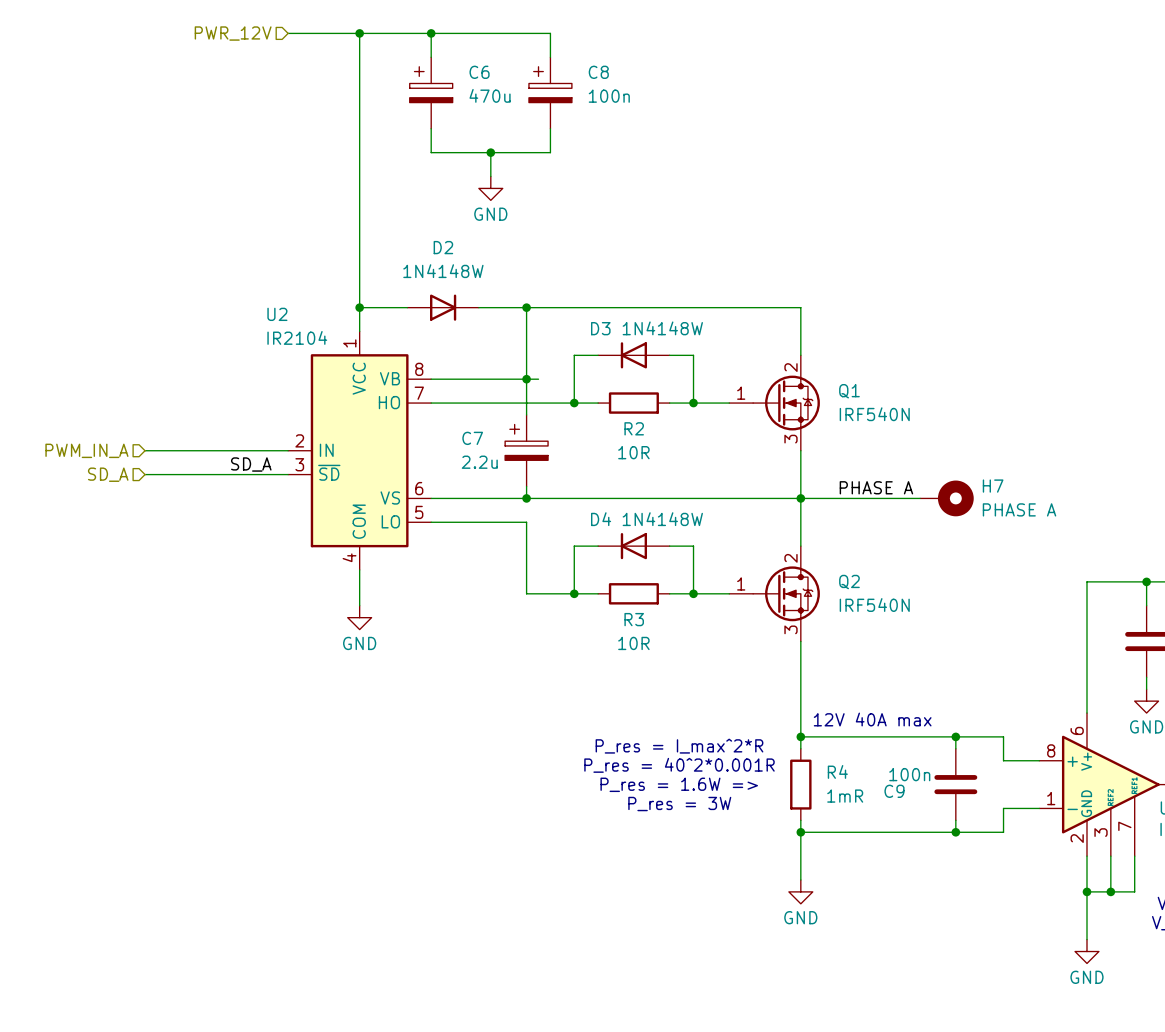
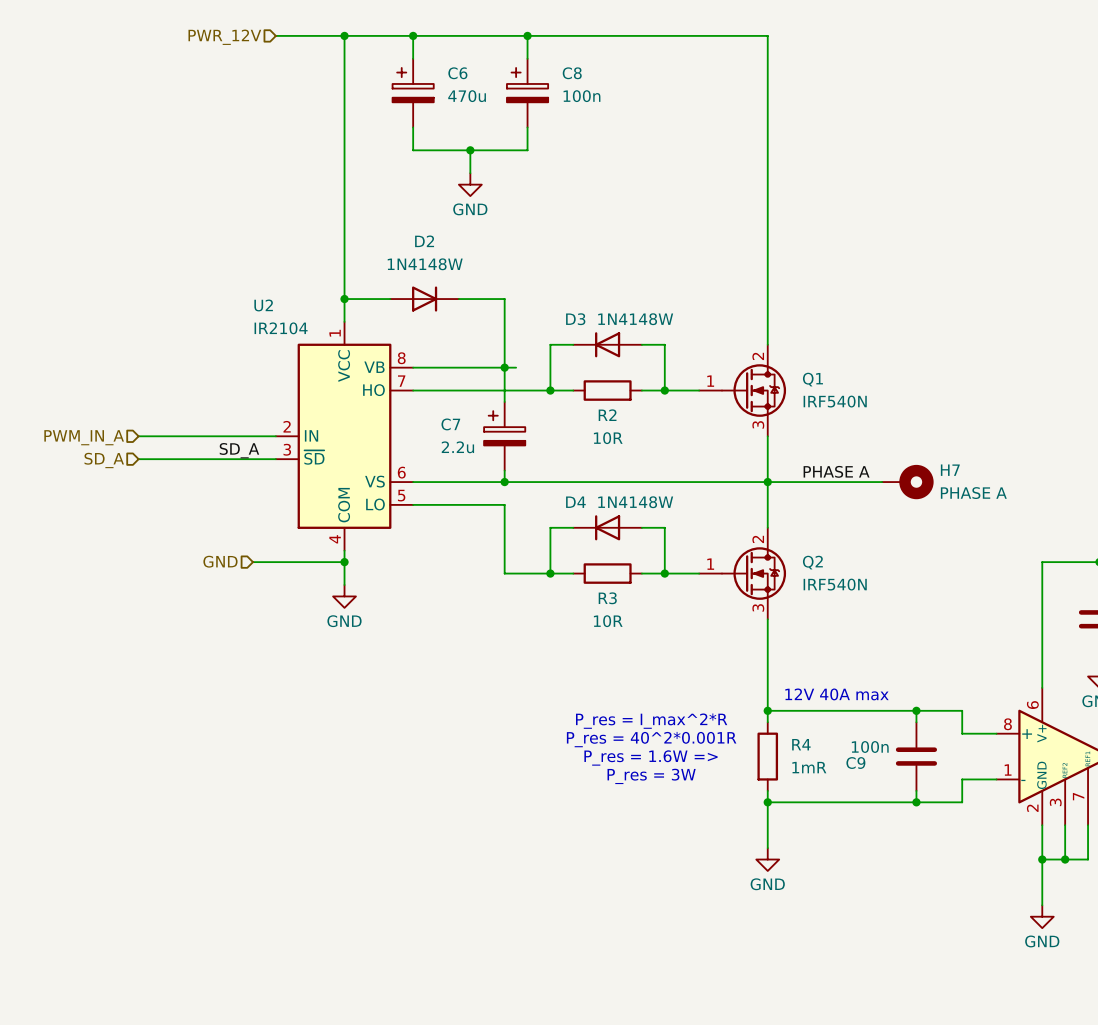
junction: none -> (527, 35)
wire: (526, 307) (800, 307) -> (527, 35) (767, 35) (767, 299)
junction: (526, 307) -> none
hierarchical label: none -> GND (220, 561)
wire: none -> (253, 562) (344, 562)
junction: none -> (344, 562)

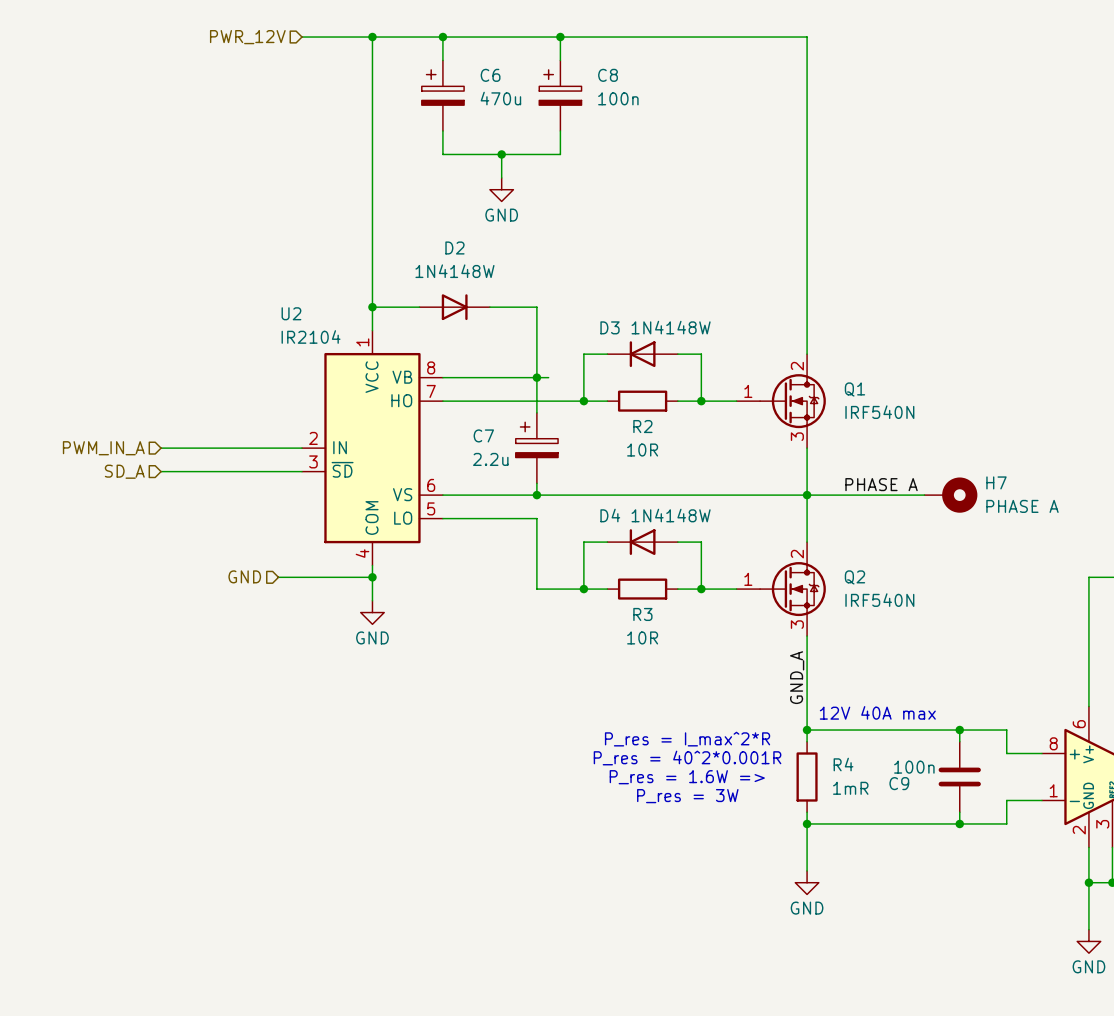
label: SD_A (239, 450) -> none
label: none -> GND_A (797, 677)

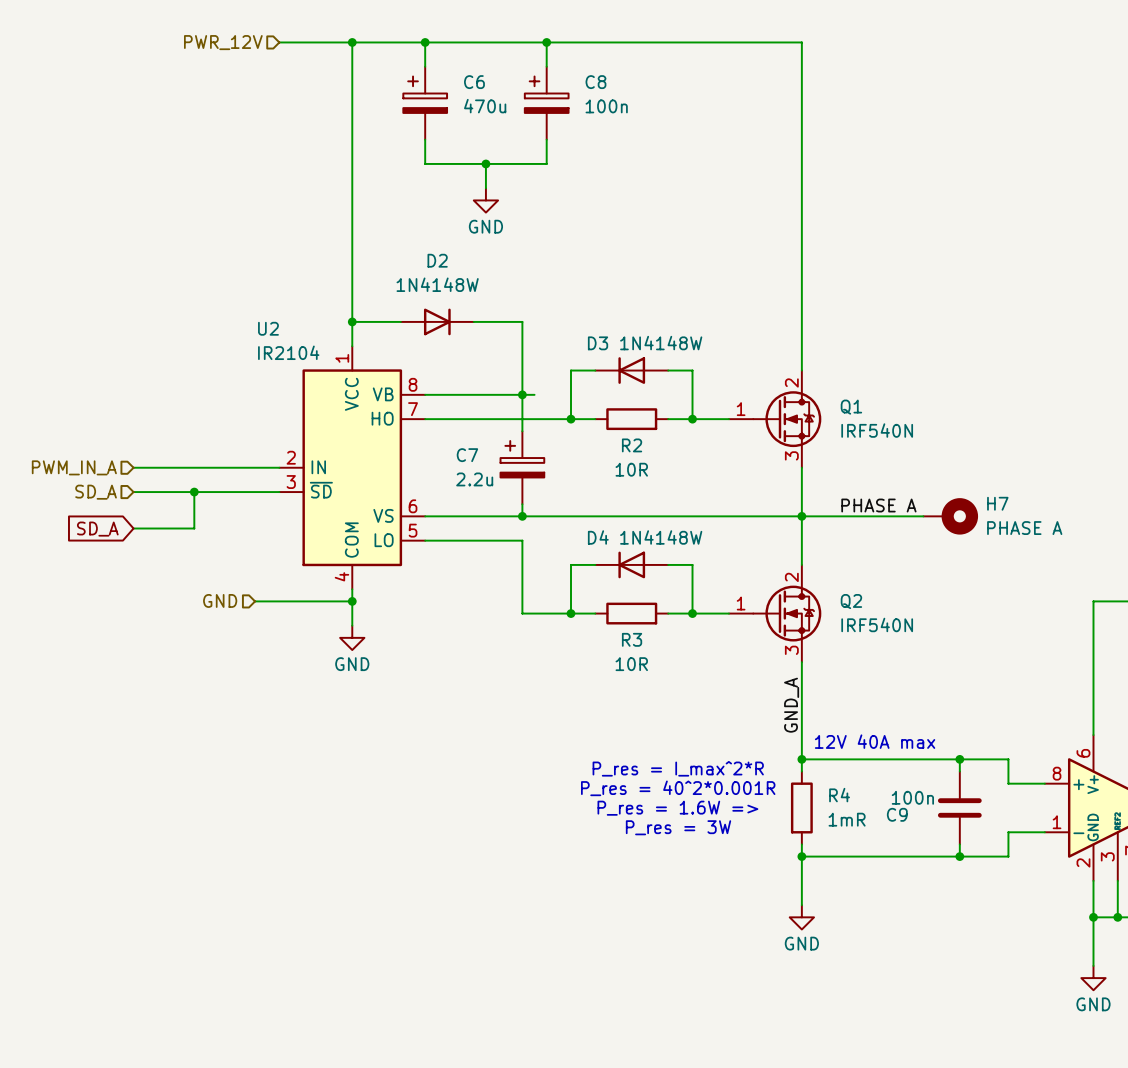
wire: none -> (194, 492) (194, 528) (133, 528)
junction: none -> (194, 492)
global label: none -> SD_A (97, 529)

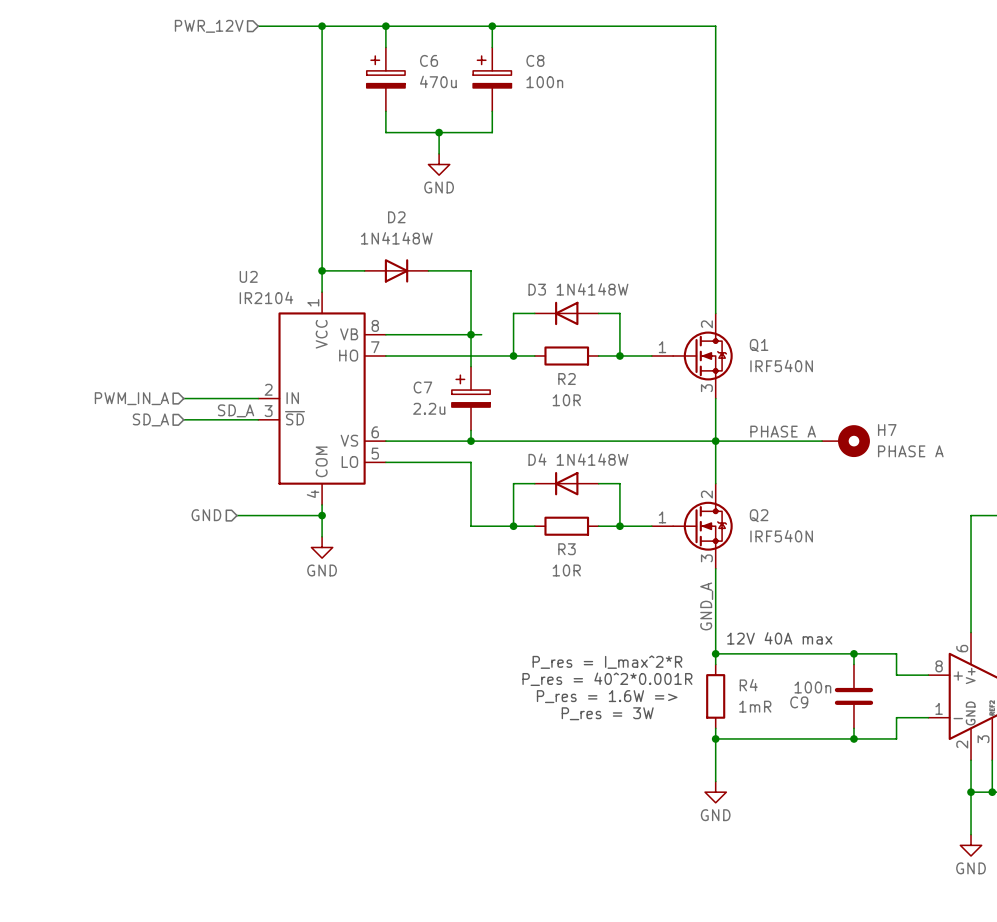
hierarchical label position: PWM_IN_A (74, 467) -> PWM_IN_A (131, 398)
wire: (133, 467) (194, 467) -> none
label: none -> SD_A (236, 410)
hierarchical label position: SD_A (96, 492) -> SD_A (150, 419)
wire: (133, 492) (194, 492) (194, 528) (133, 528) -> none
junction: (194, 492) -> none
global label: SD_A (97, 529) -> none

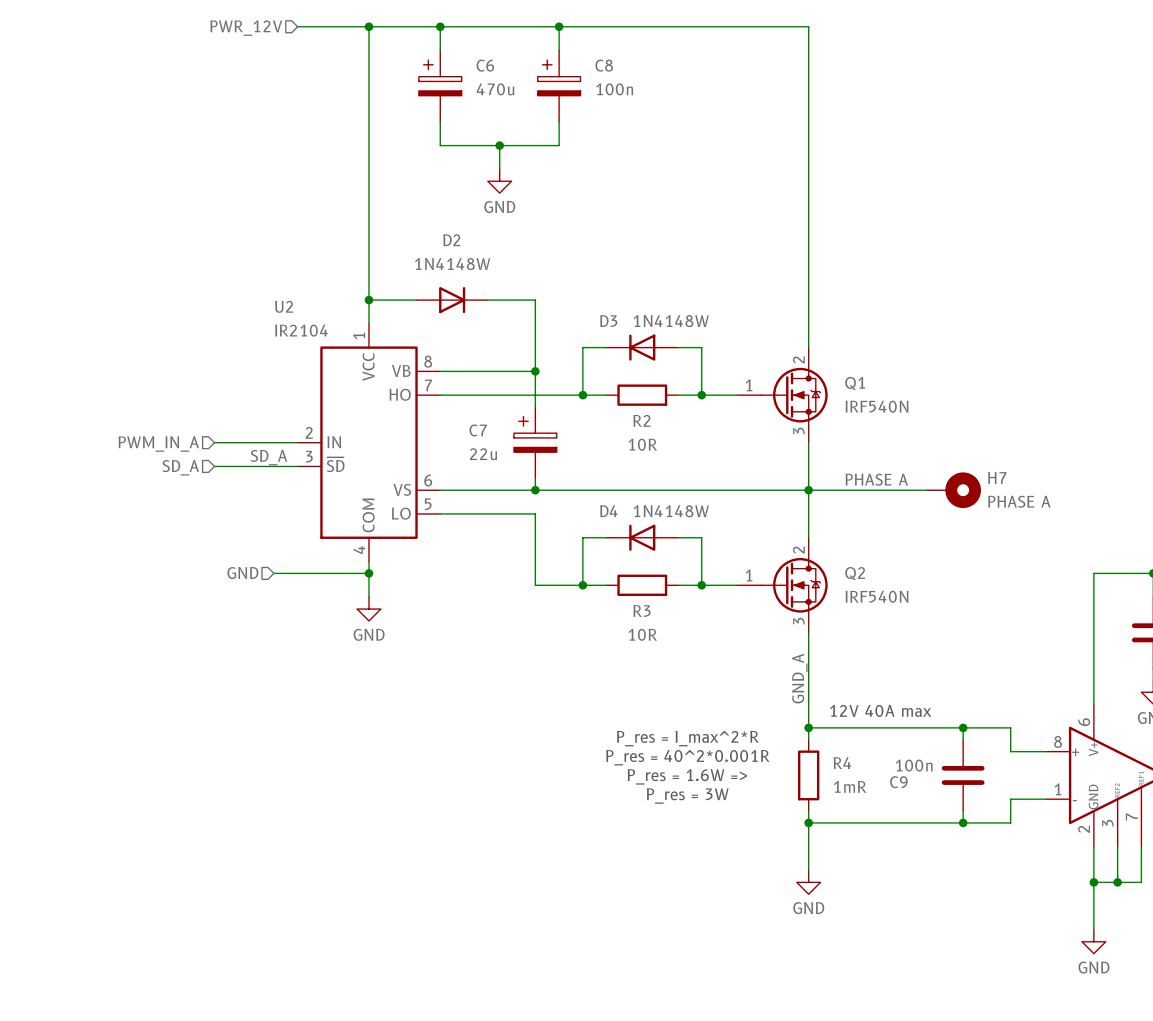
wire: (471, 334) (481, 334) -> none
C7 value: 2.2u (429, 408) -> 22u (483, 454)

